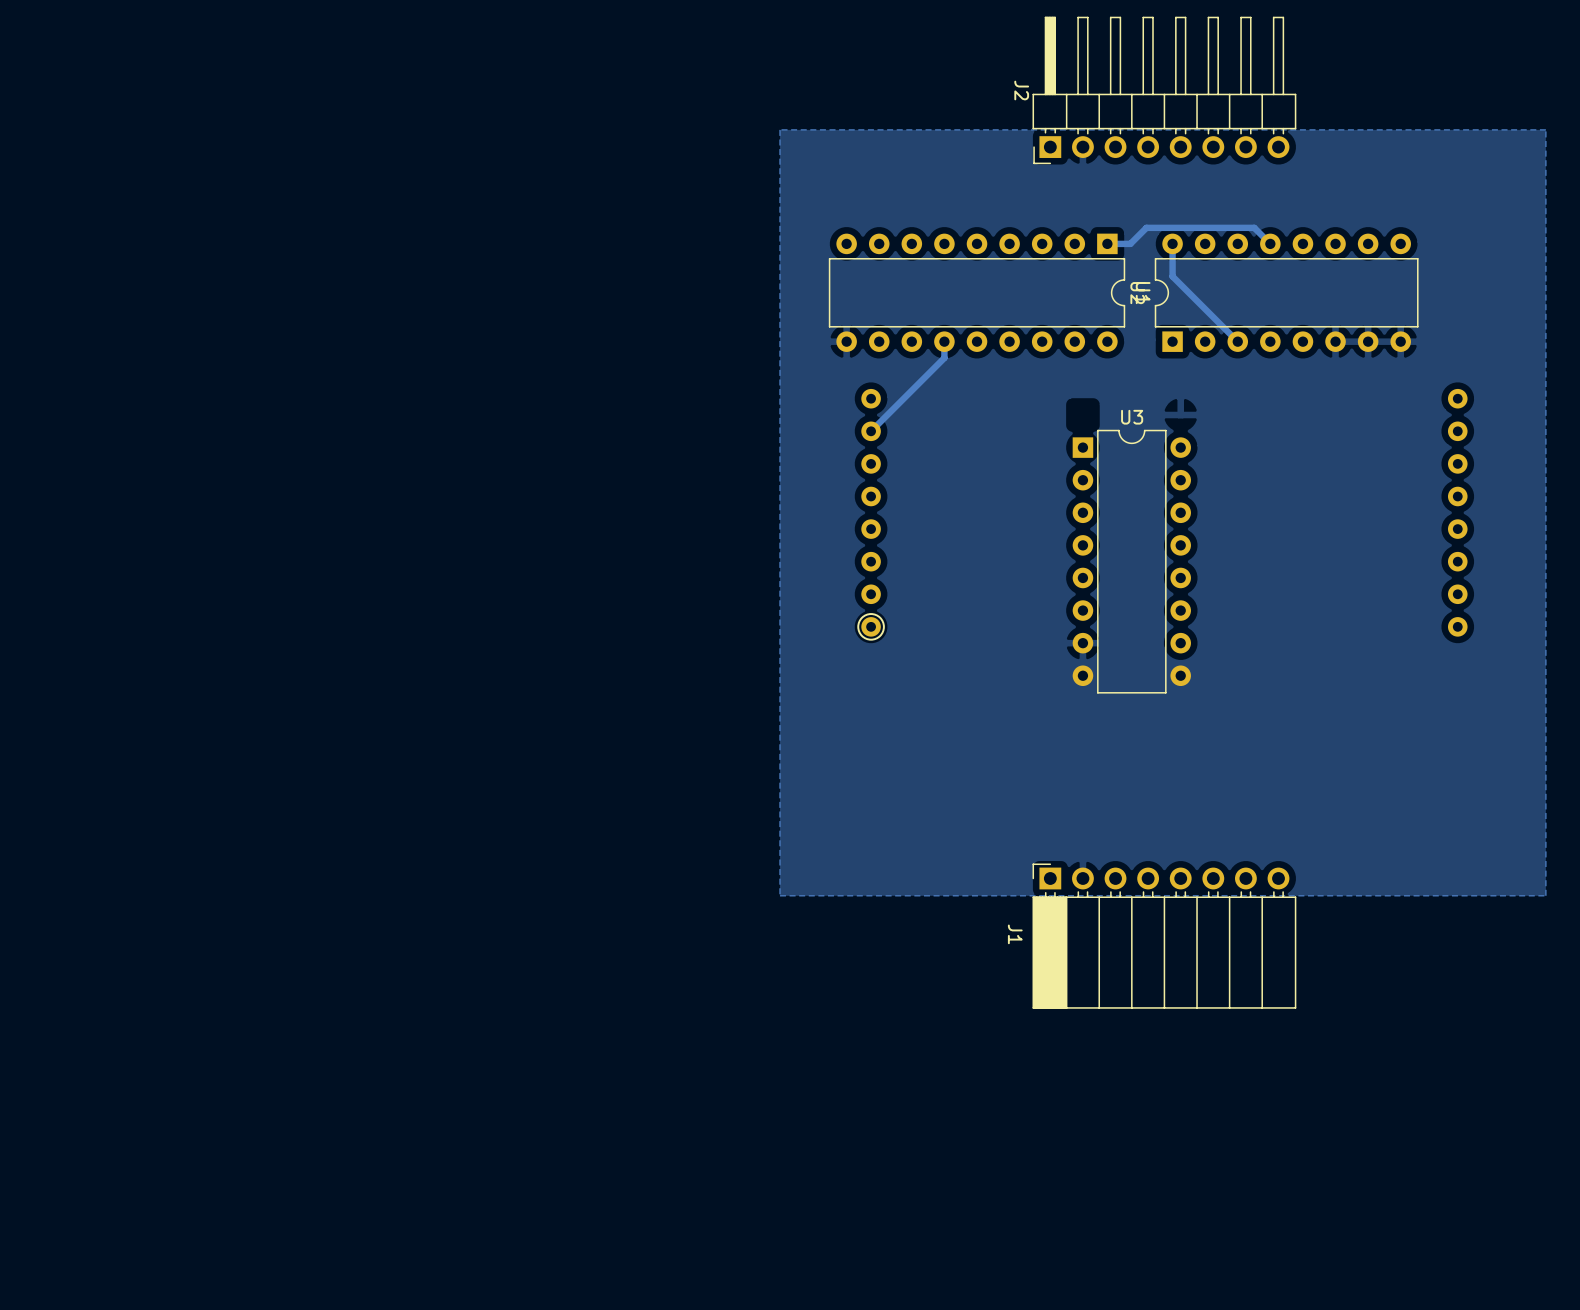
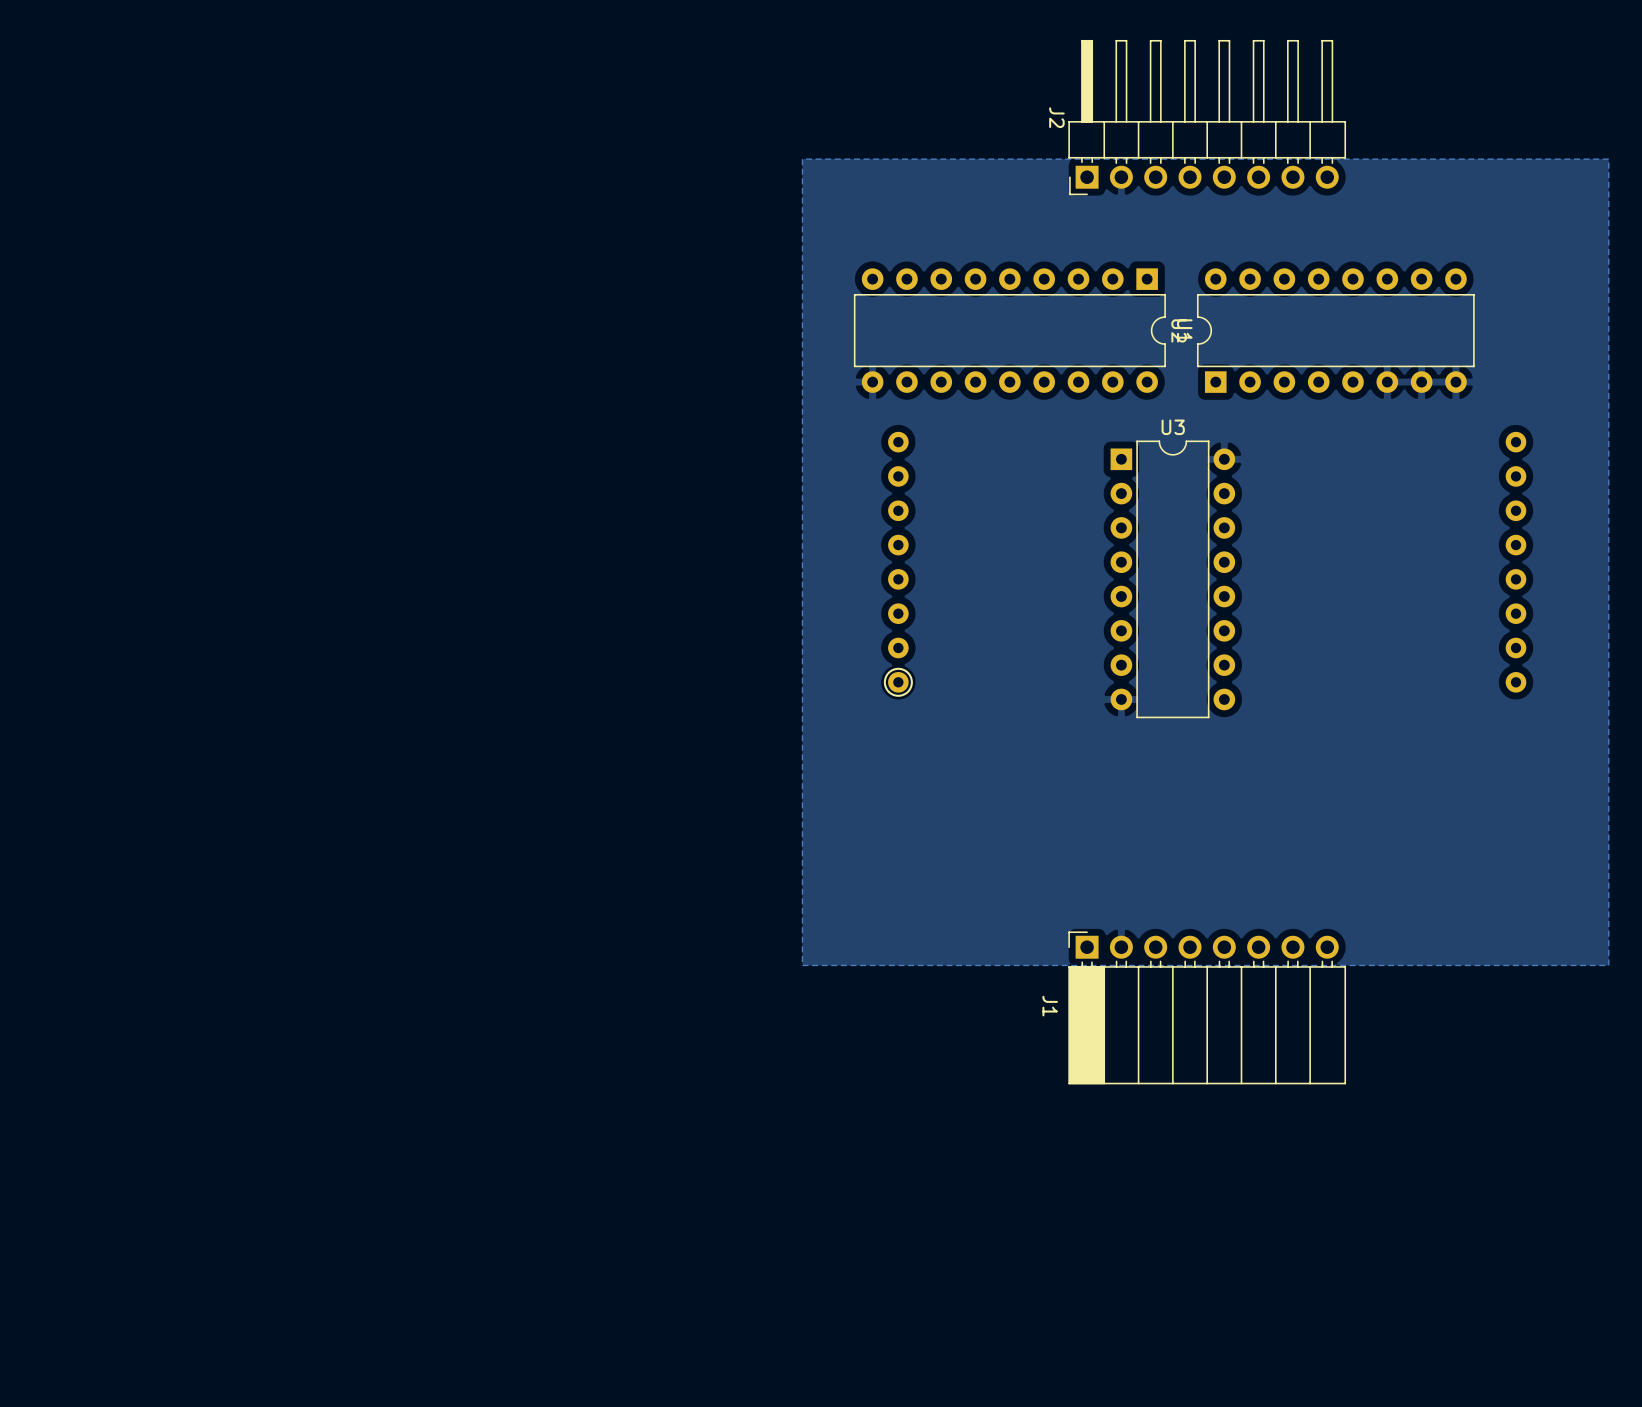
track: (1172, 243) (1172, 276) (1237, 341) -> none
track: (1270, 243) (1254, 227) (1146, 227) (1130, 243) (1107, 243) -> none
track: (944, 341) (944, 357) (871, 431) -> none
U3 position: (1131, 561) -> (1172, 579)

